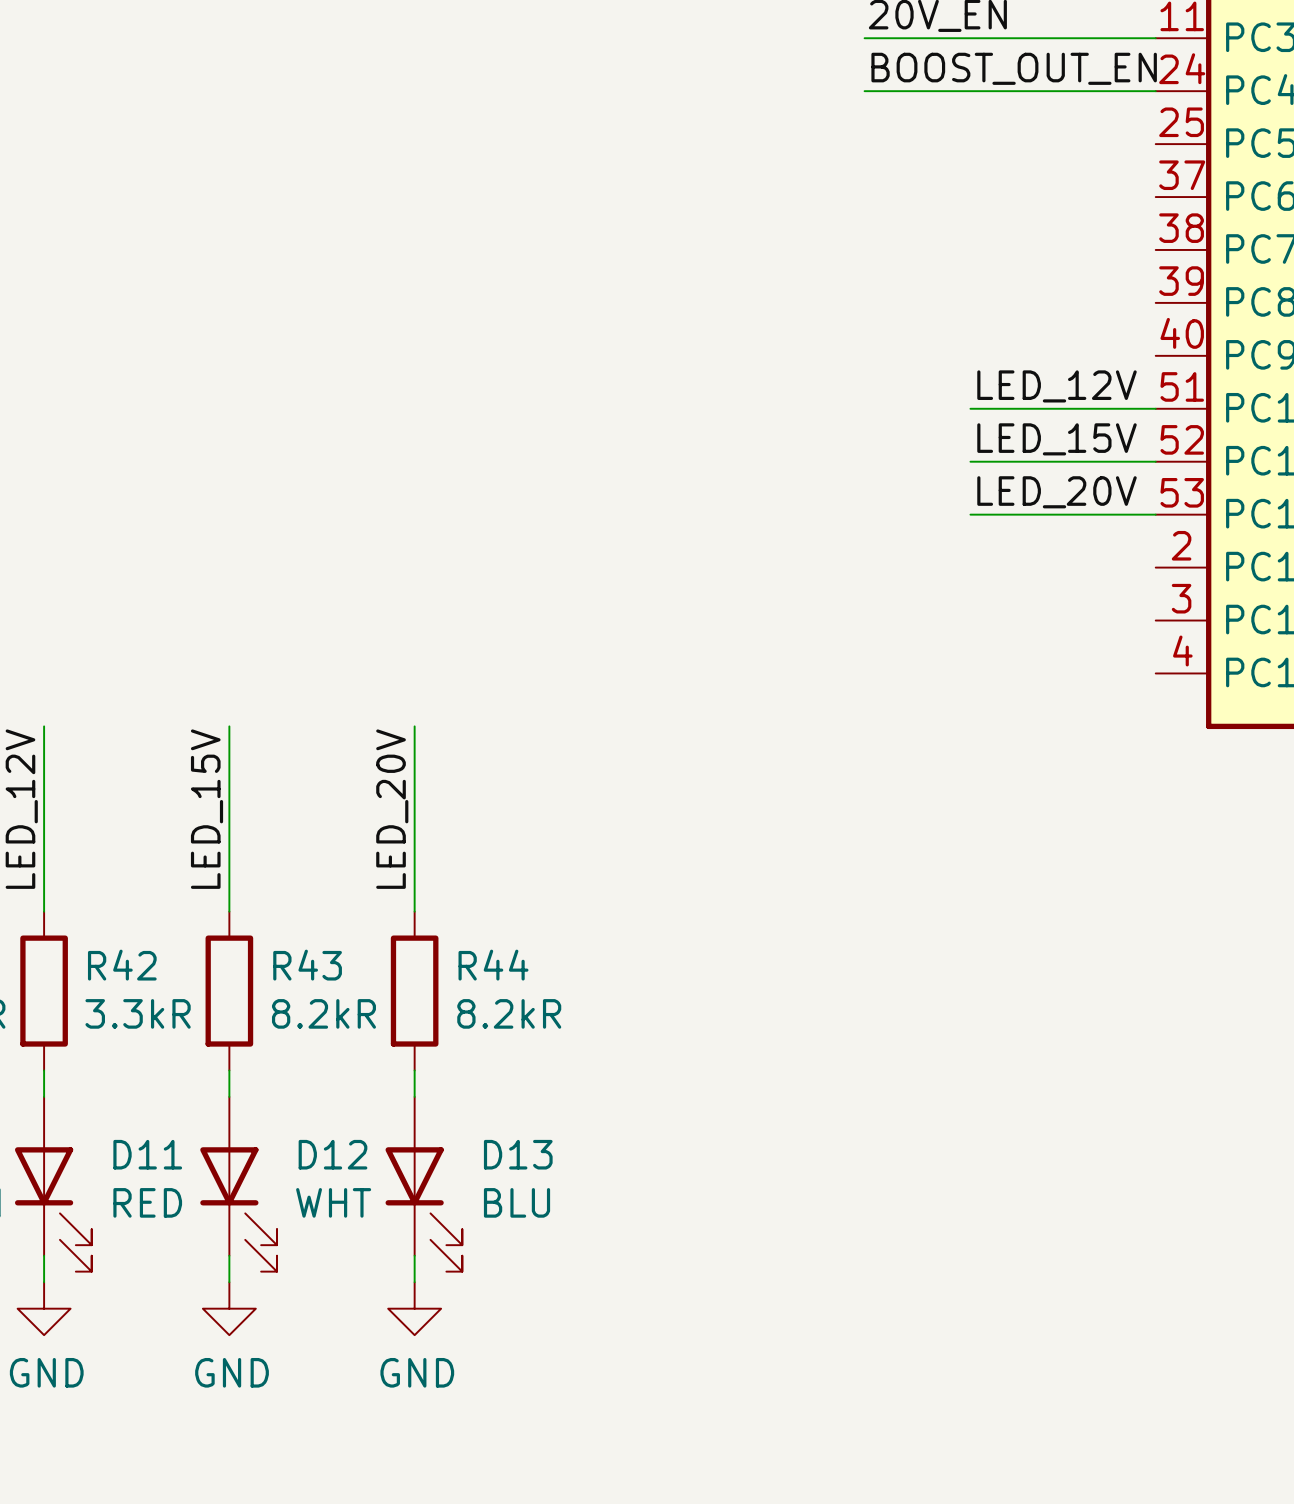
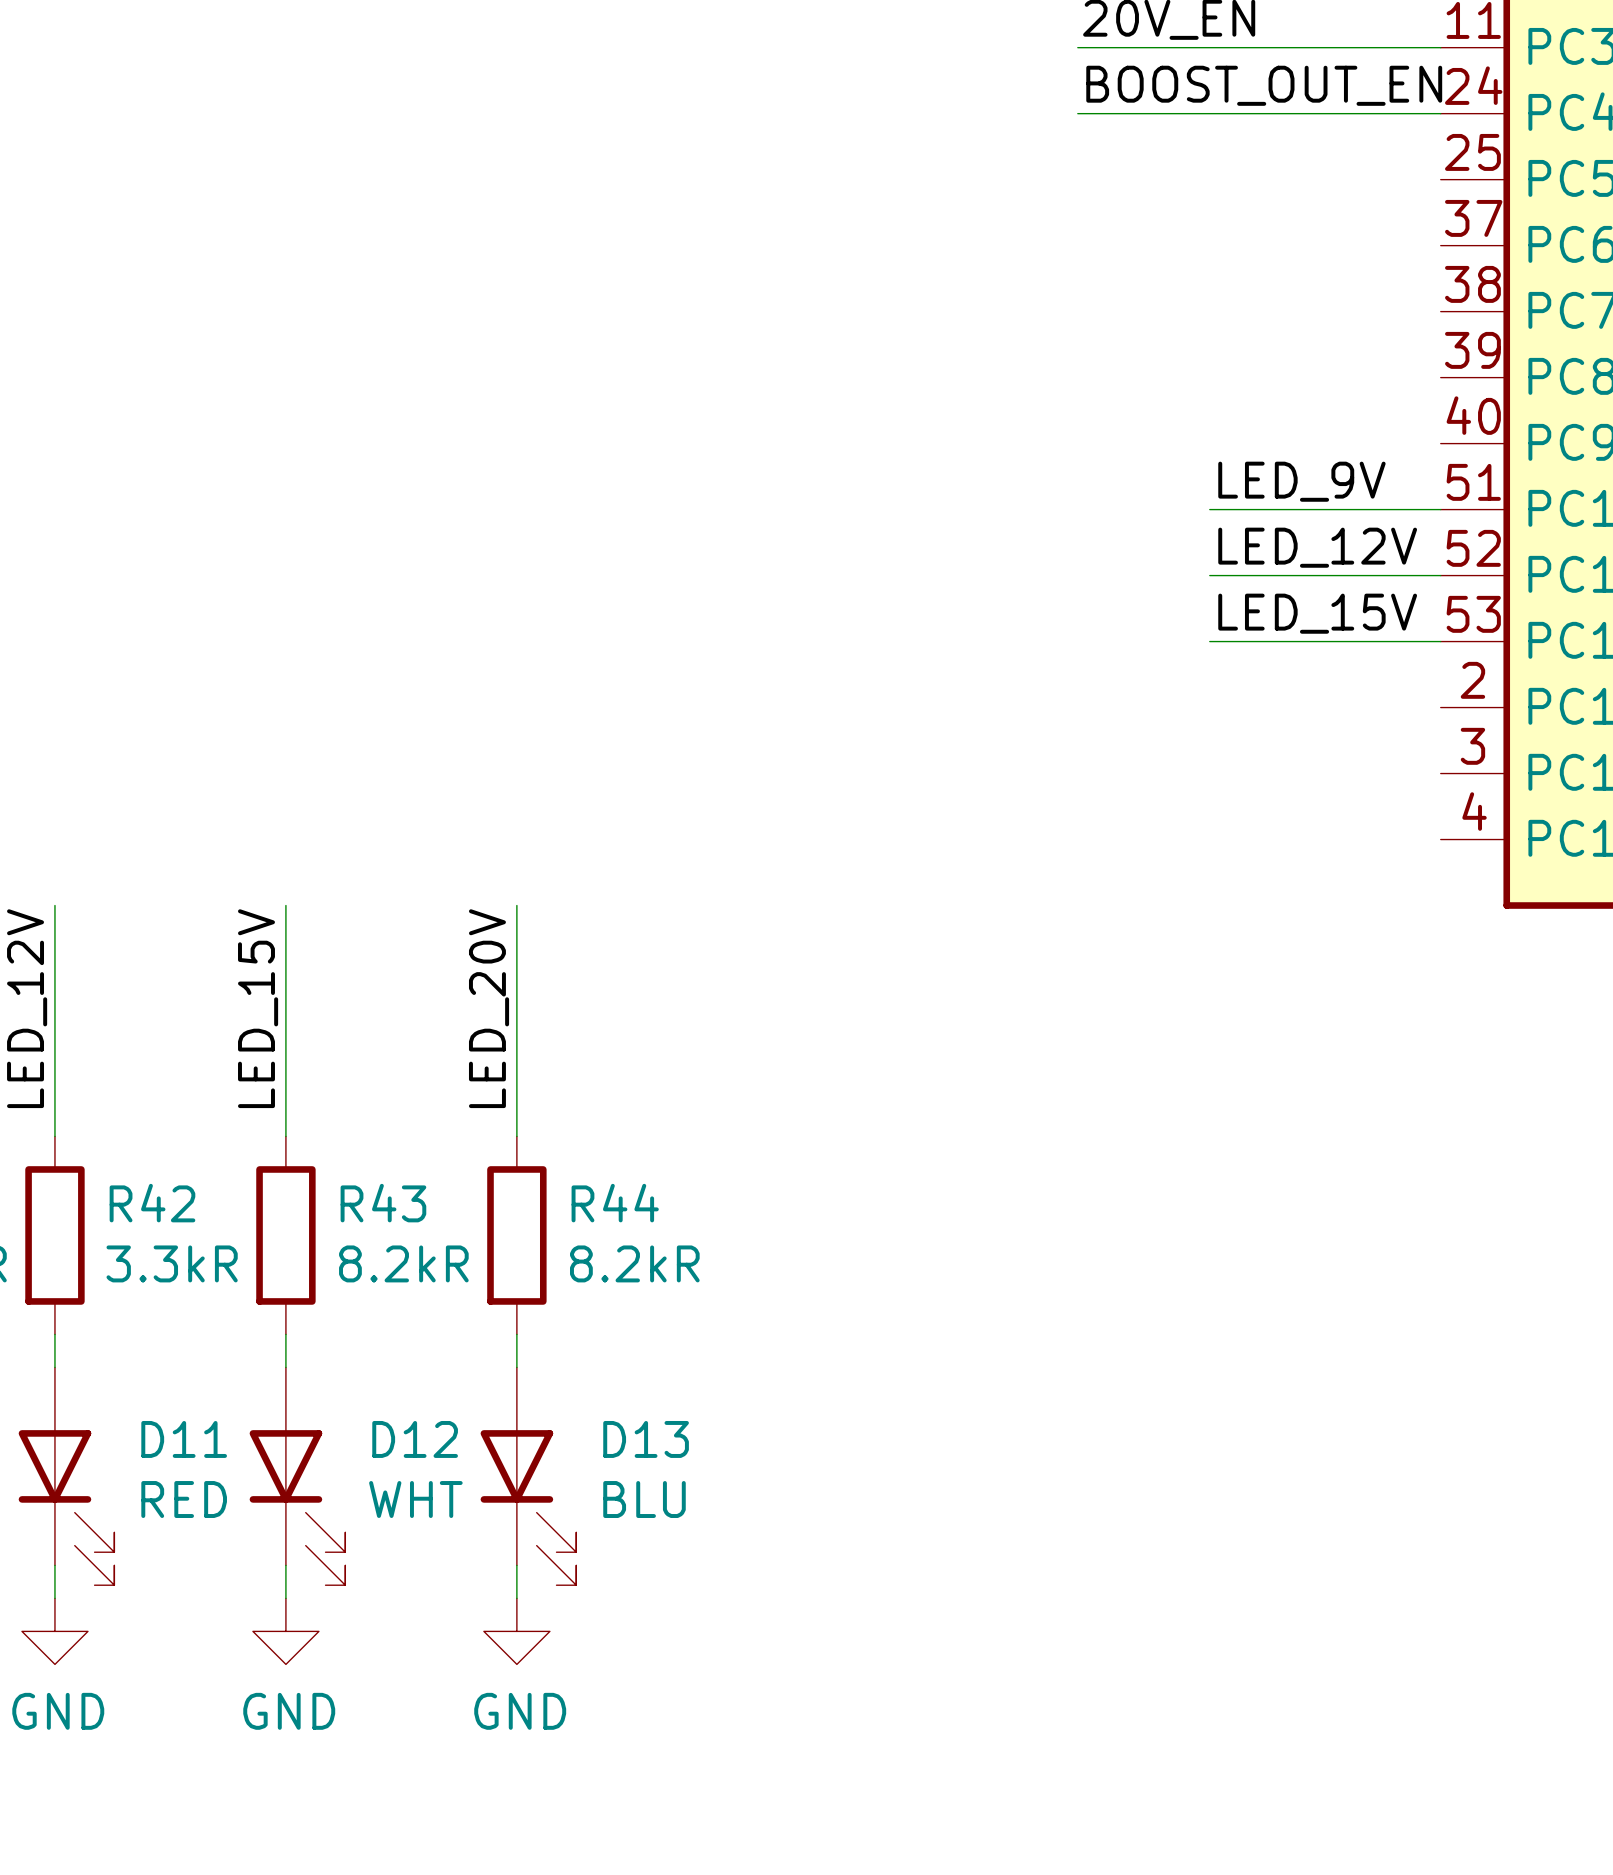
label: LED_12V (1057, 386) -> LED_9V (1301, 481)
label: LED_15V (1057, 439) -> LED_12V (1317, 547)
label: LED_20V (1057, 492) -> LED_15V (1317, 613)

